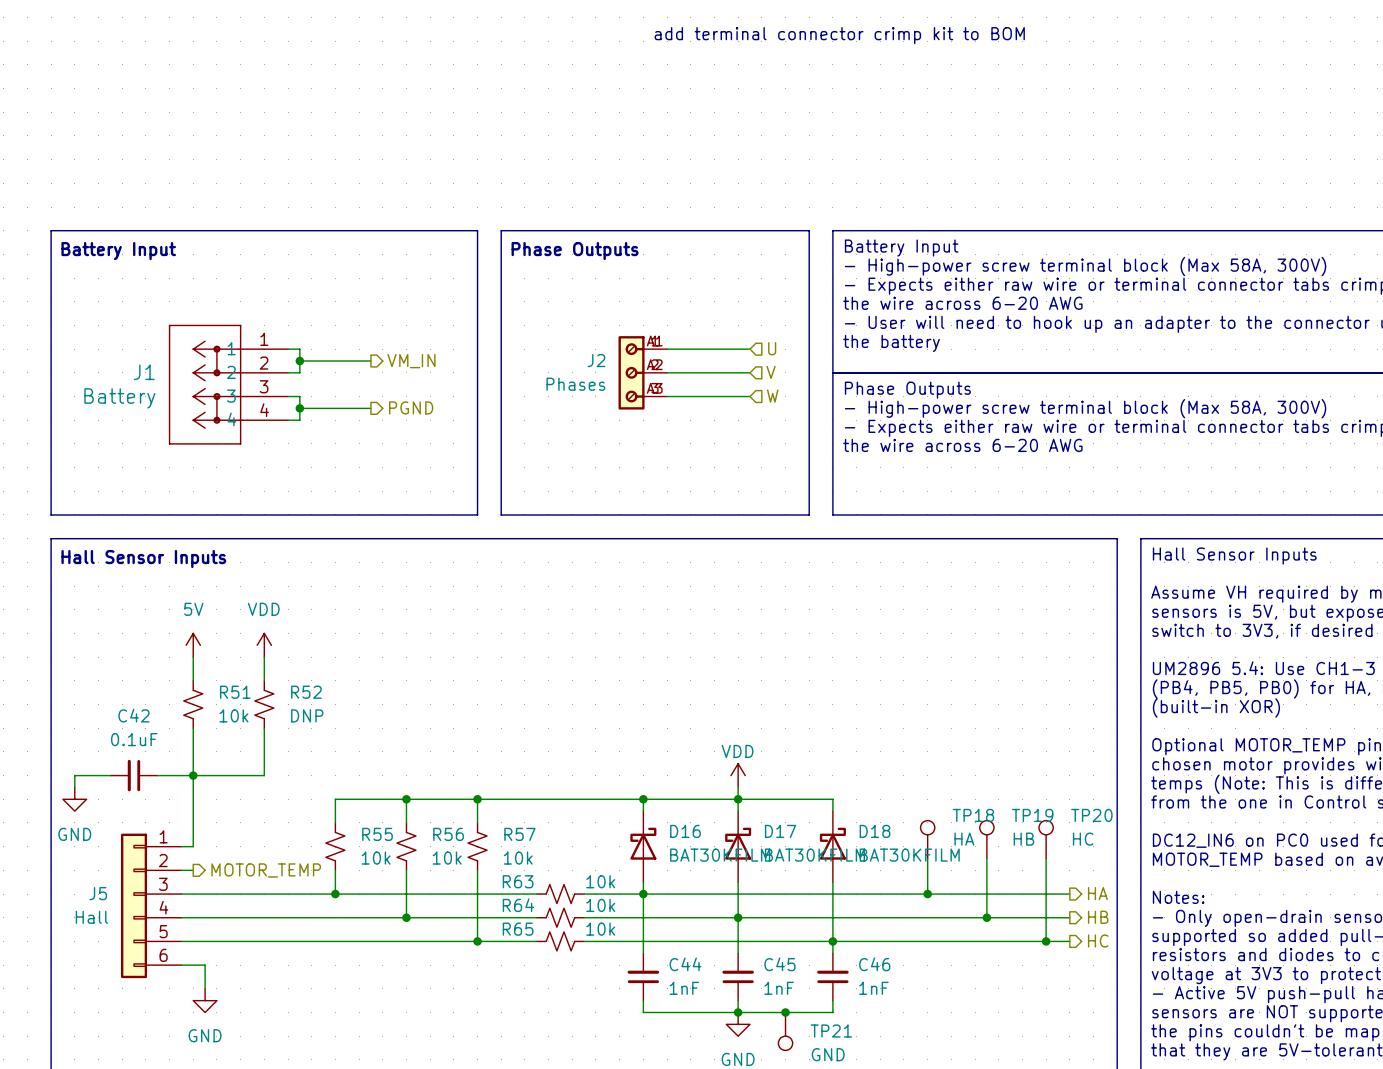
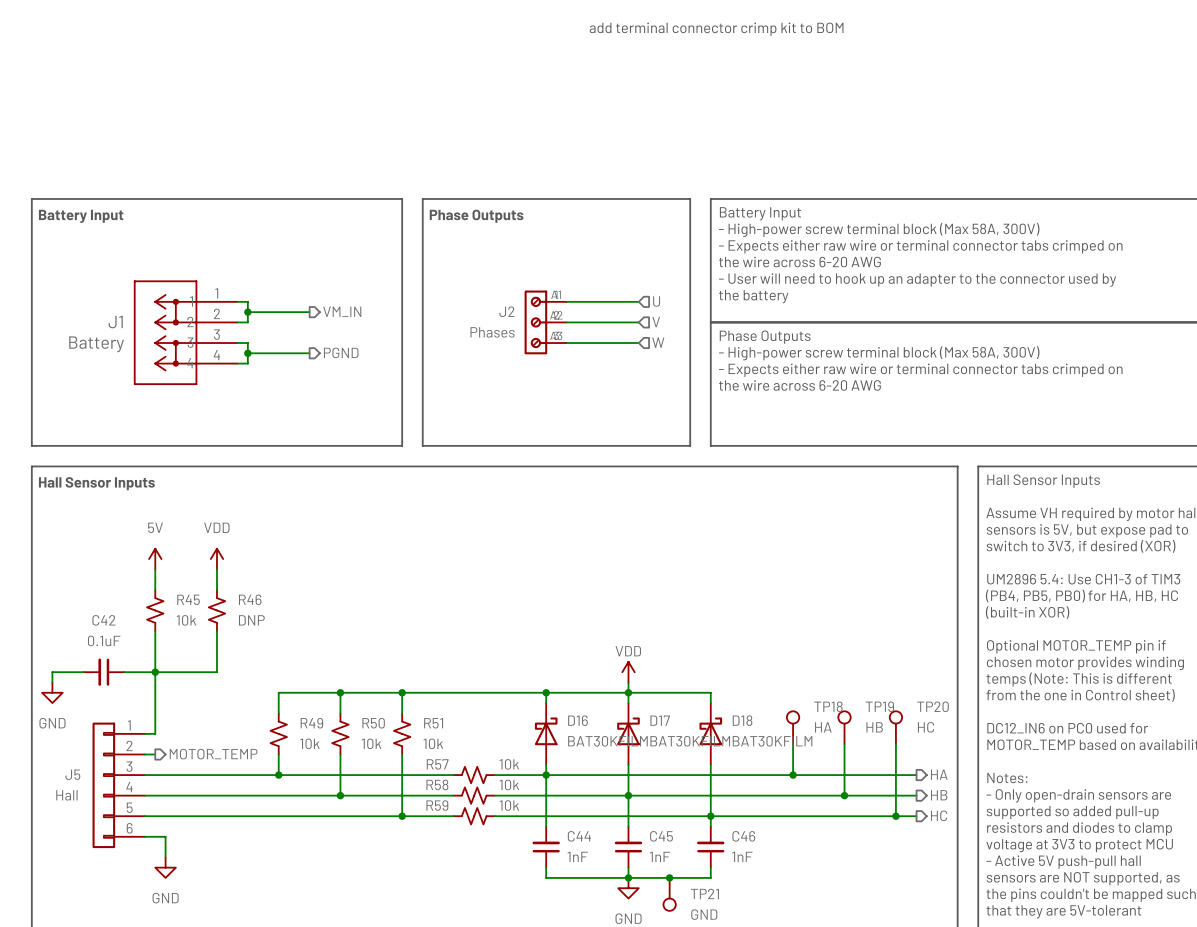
R51 name: R51 (235, 692) -> R45 (188, 599)
R52 name: R52 (306, 692) -> R46 (250, 599)
R55 name: R55 (377, 834) -> R49 (311, 723)
R56 name: R56 (448, 834) -> R50 (373, 723)
R57 name: R57 (519, 834) -> R51 (433, 723)
R63 name: R63 (518, 881) -> R57 (437, 764)
R64 name: R64 (518, 905) -> R58 (437, 784)
R65 name: R65 (518, 929) -> R59 (437, 805)

